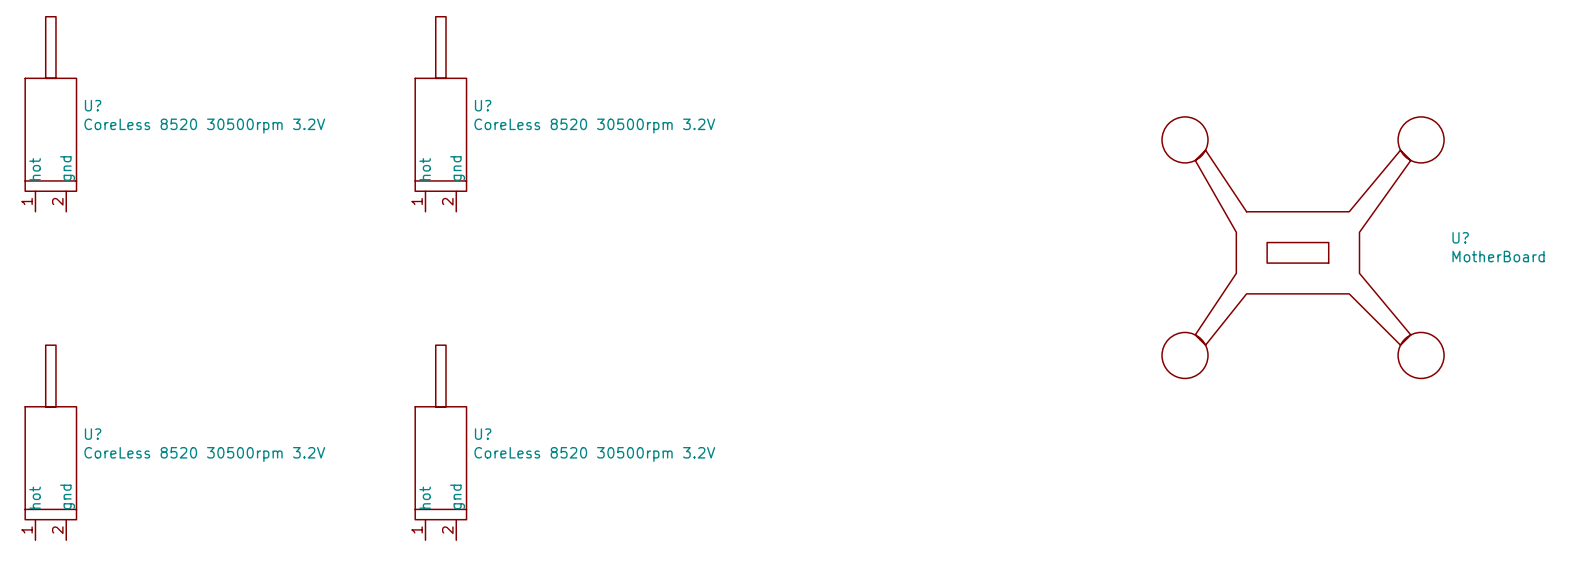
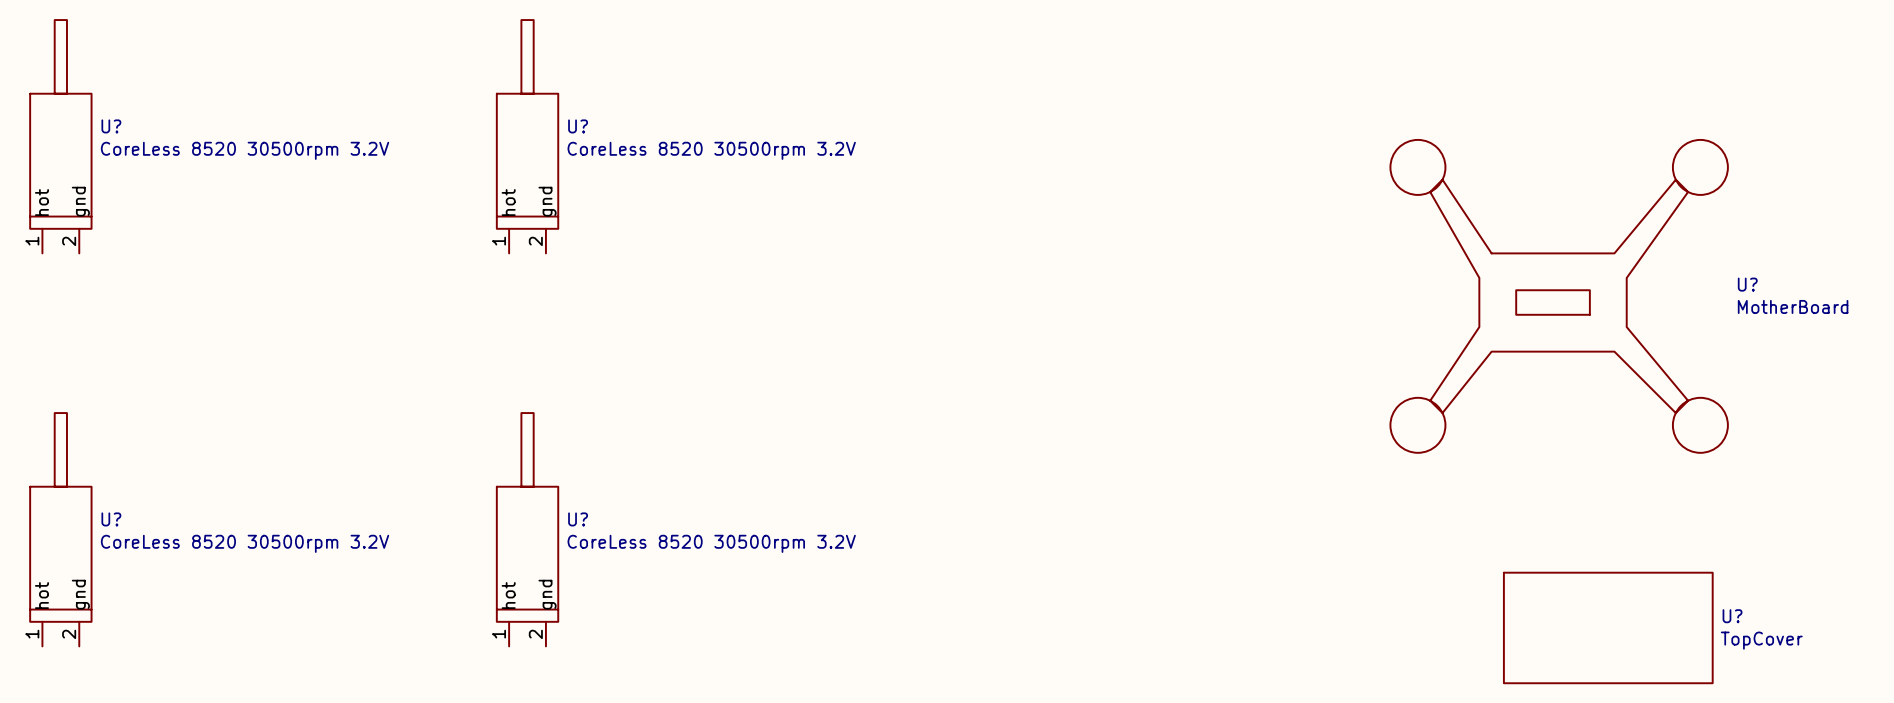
U?: none -> TopCover (1608, 627)

